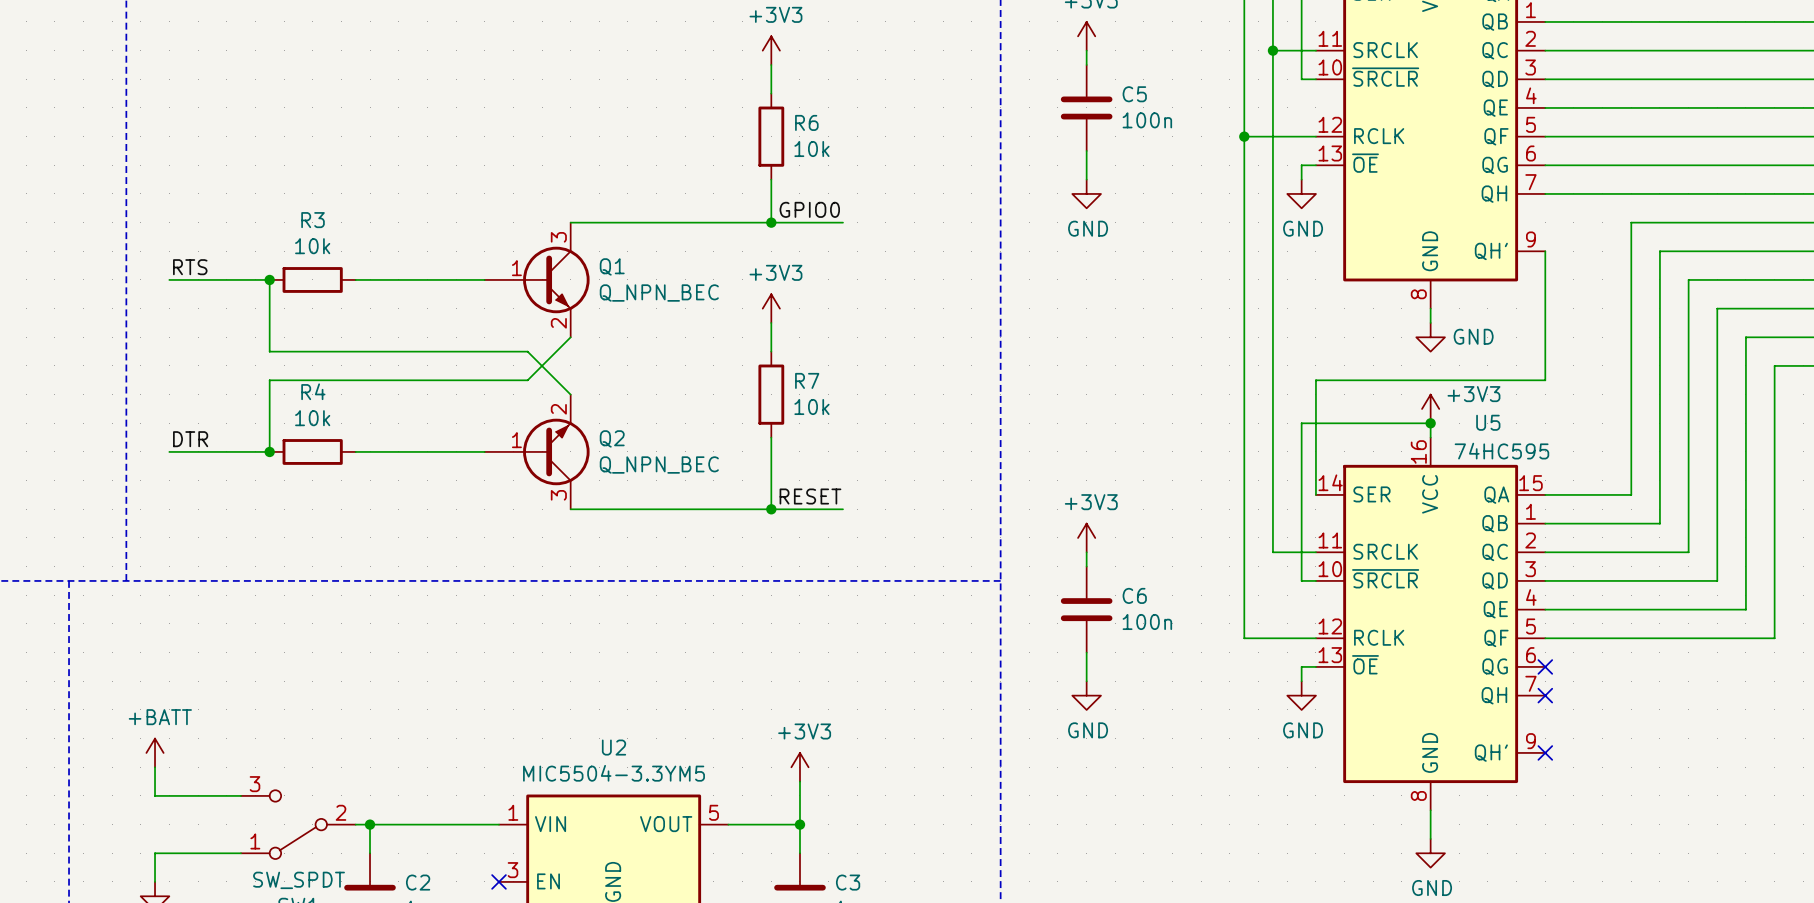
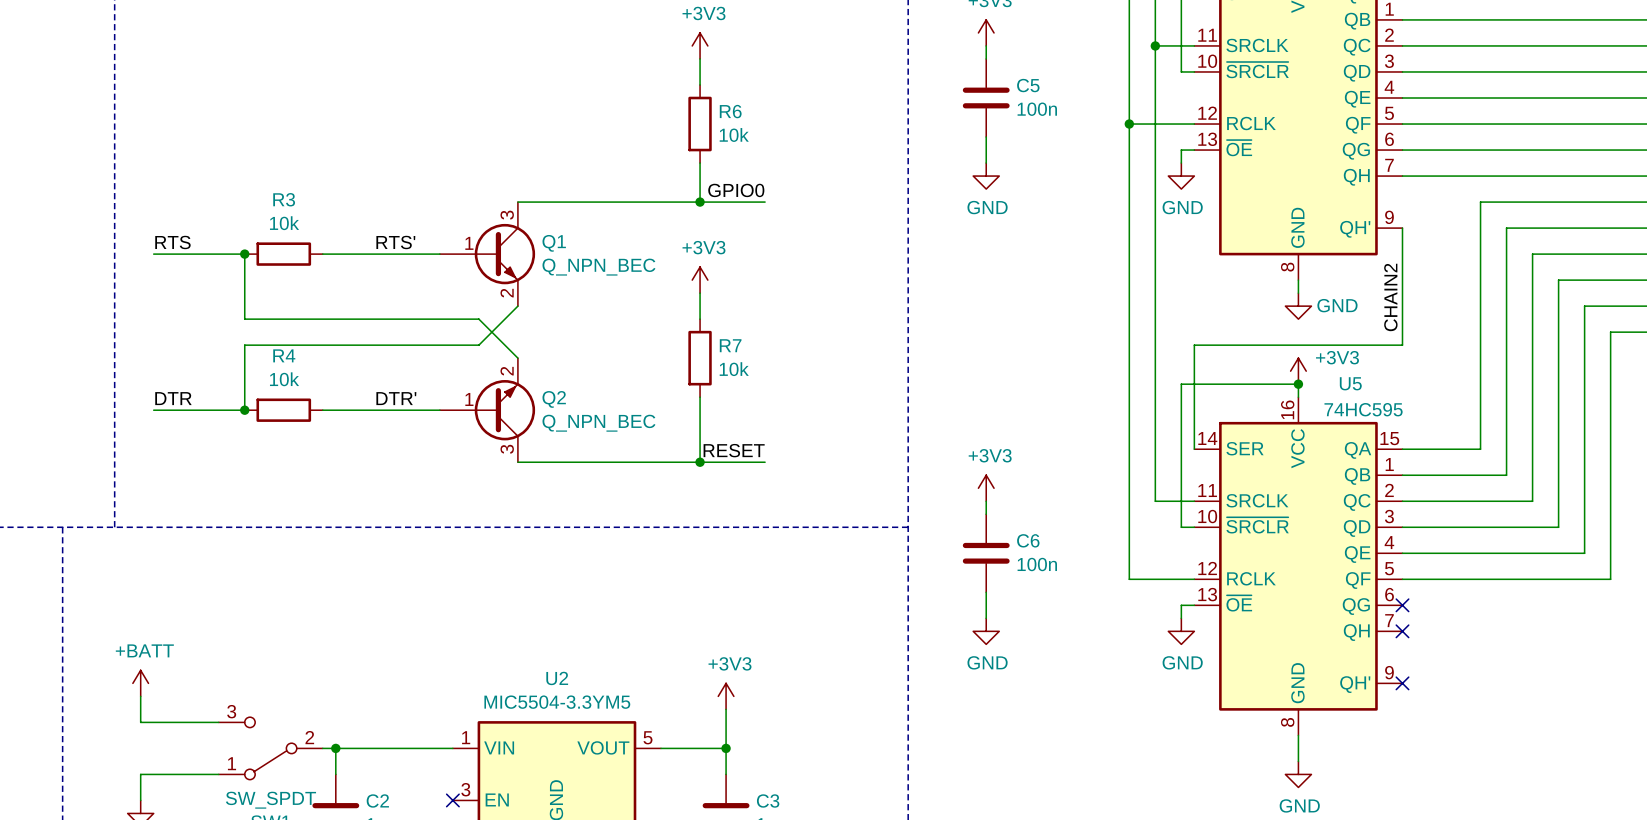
label: none -> RTS' (395, 242)
label: none -> CHAIN2 (1390, 297)
label: none -> DTR' (396, 398)

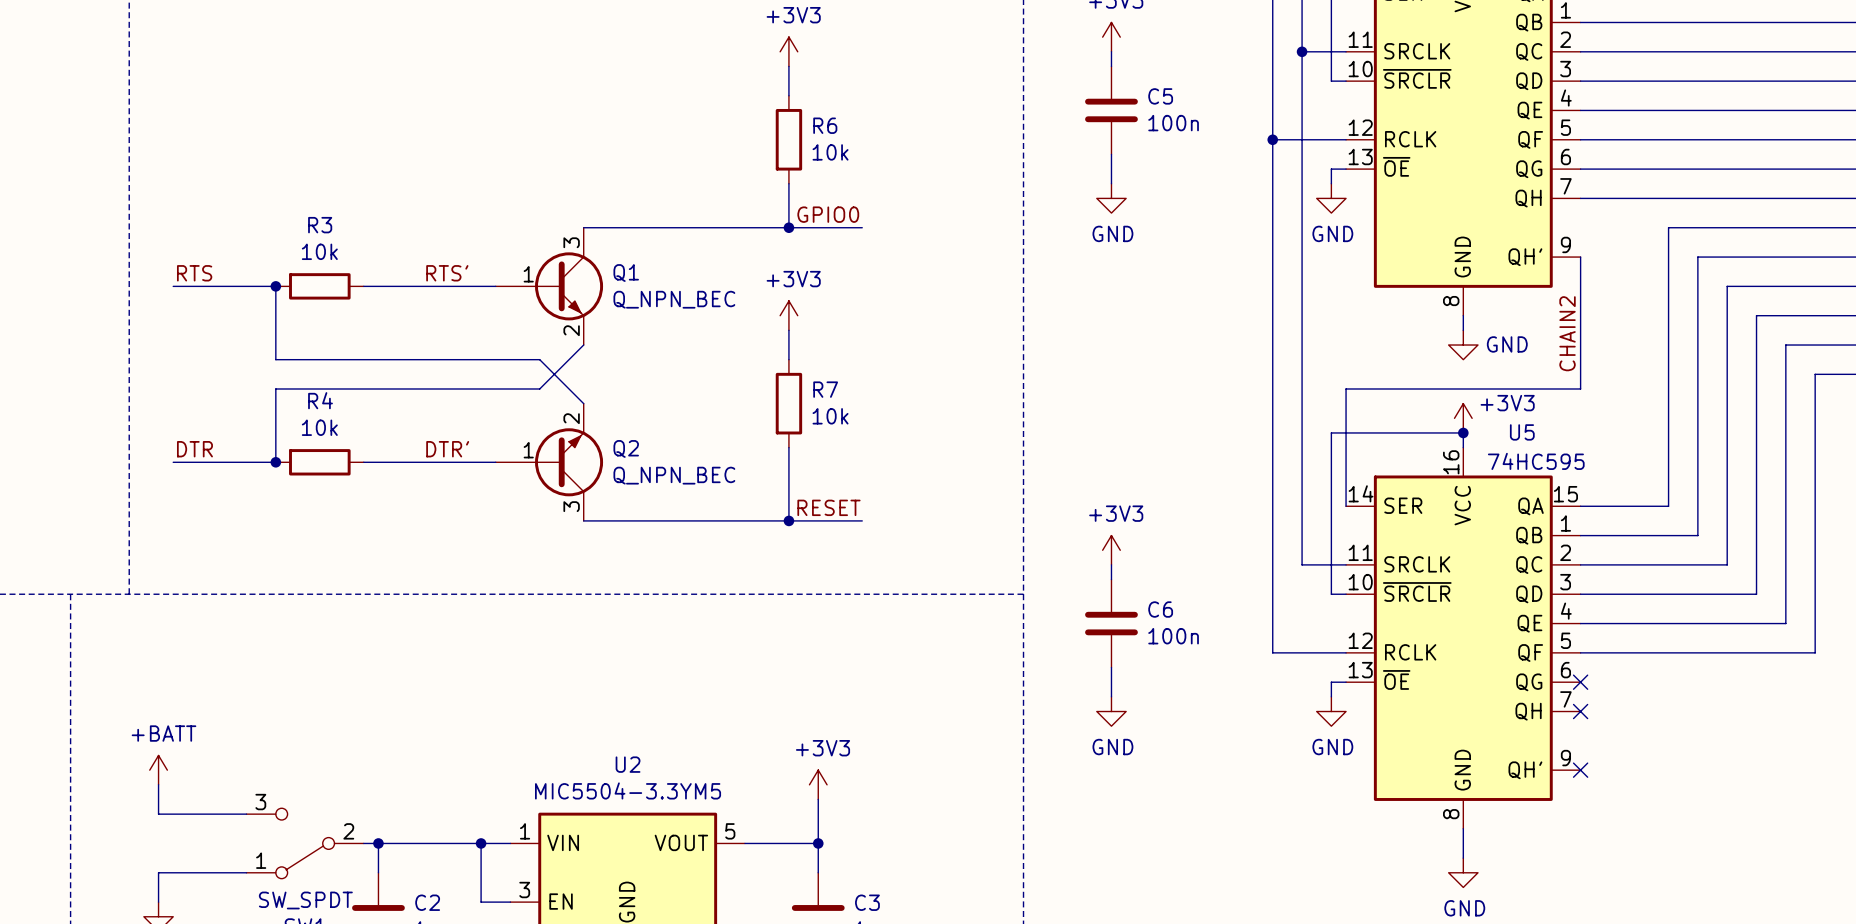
wire: none -> (481, 843) (481, 902) (510, 902)
junction: none -> (481, 843)
no-connect mark: (452, 800) -> none

